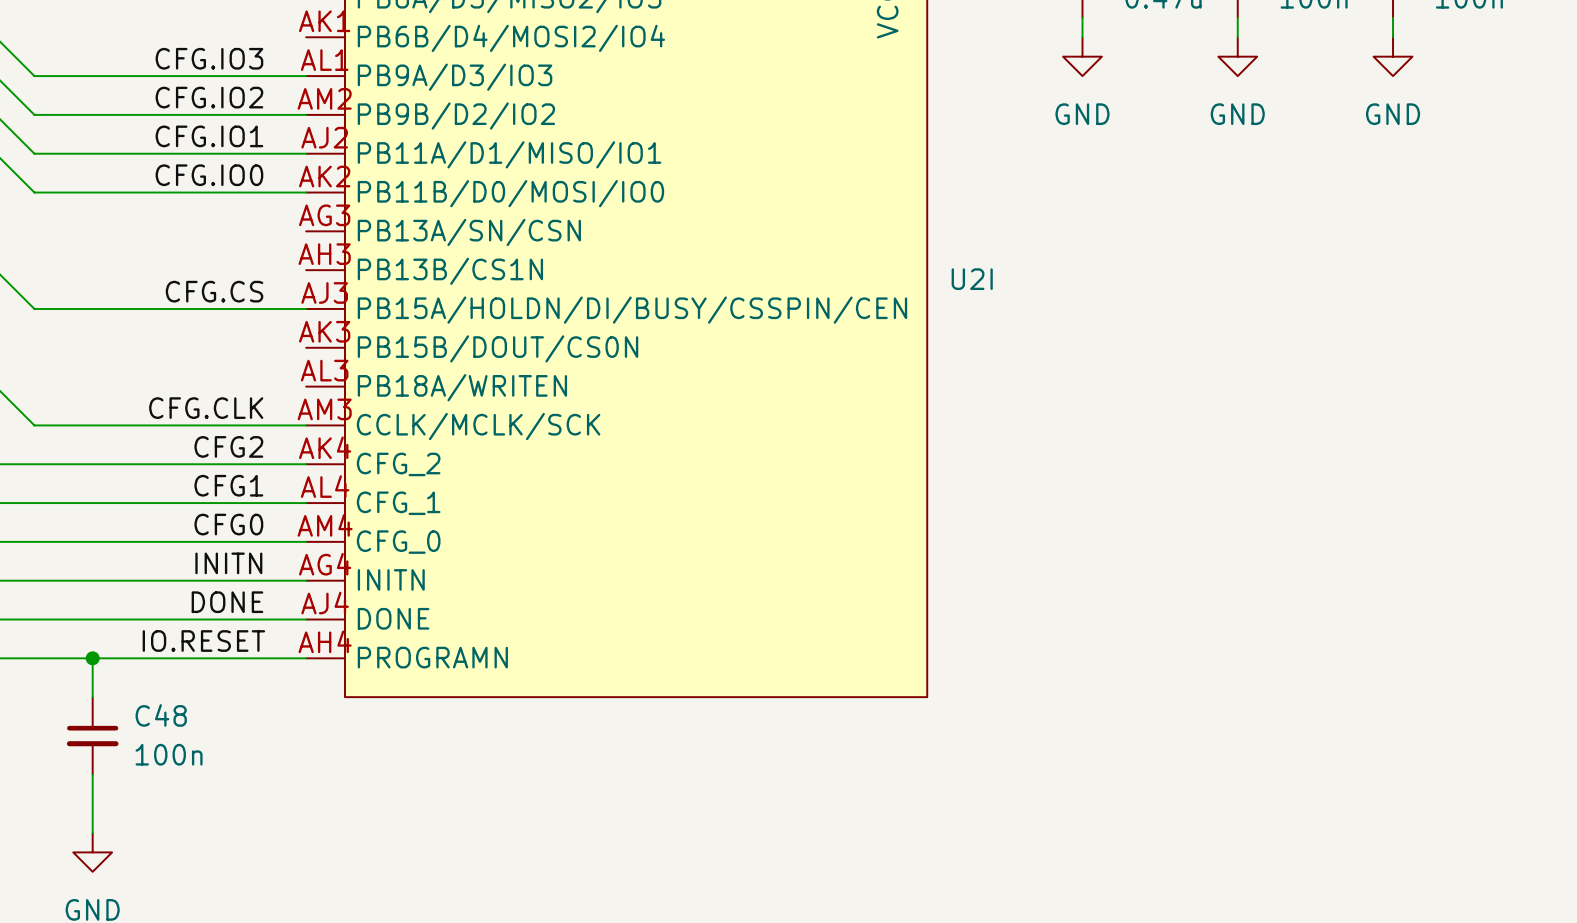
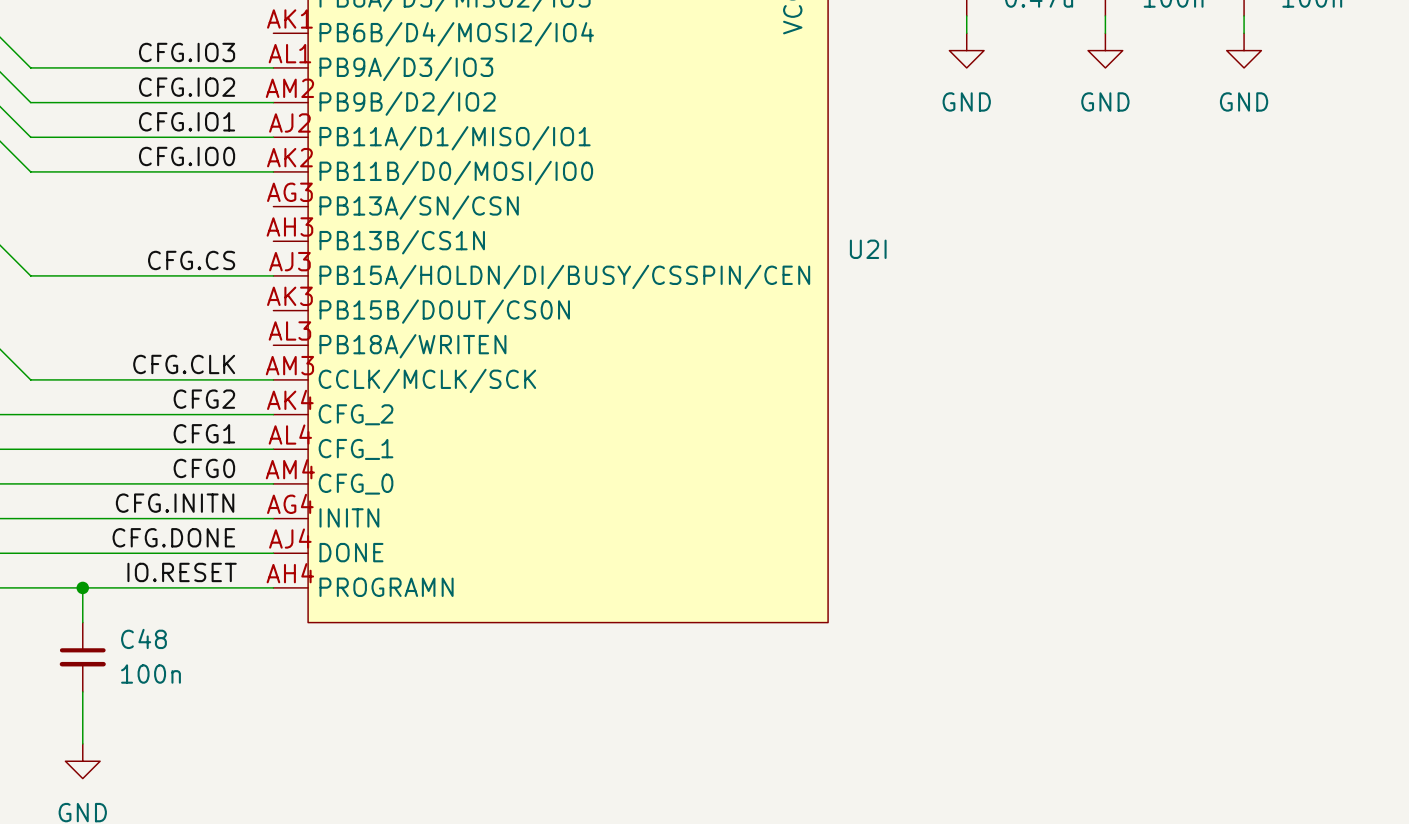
label: INITN (228, 563) -> CFG.INITN (175, 503)
label: DONE (227, 602) -> CFG.DONE (173, 537)

